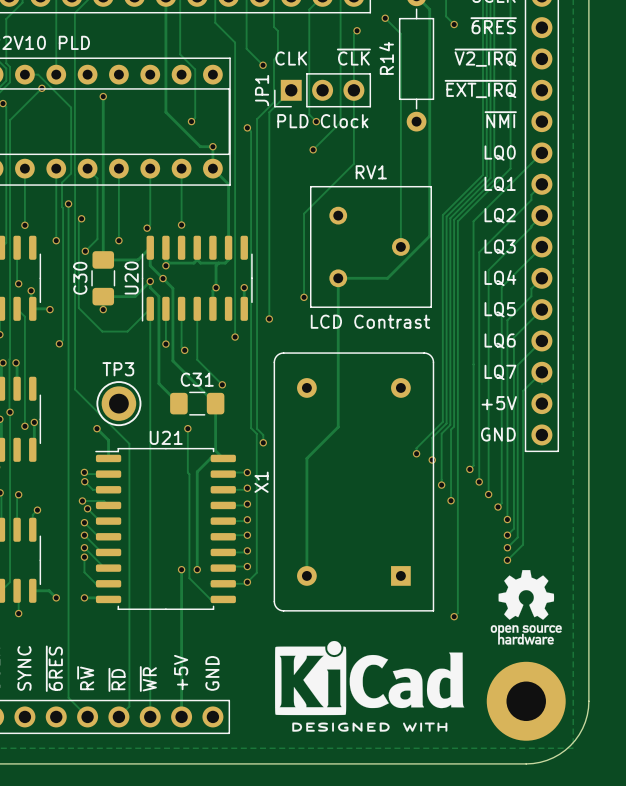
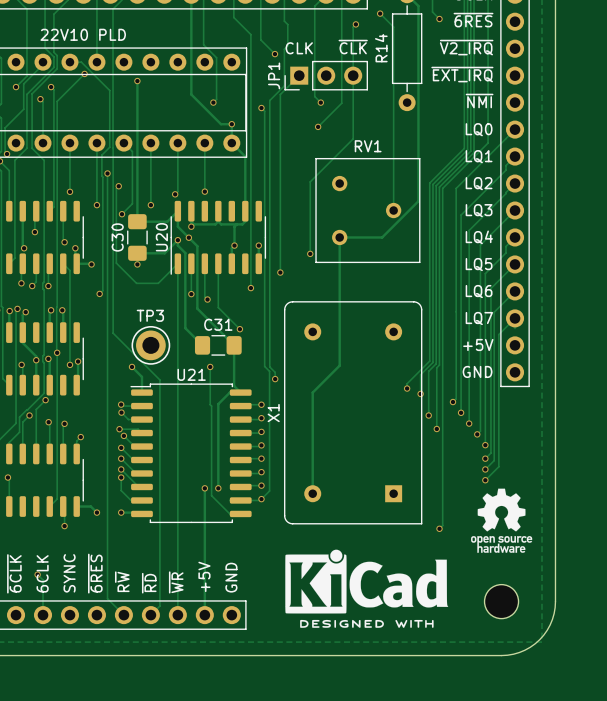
text: PLD Clock (322, 121) -> none
text: LCD Contrast (370, 321) -> none
part footprint: [486, 661, 566, 741] -> [484, 584, 519, 619]

